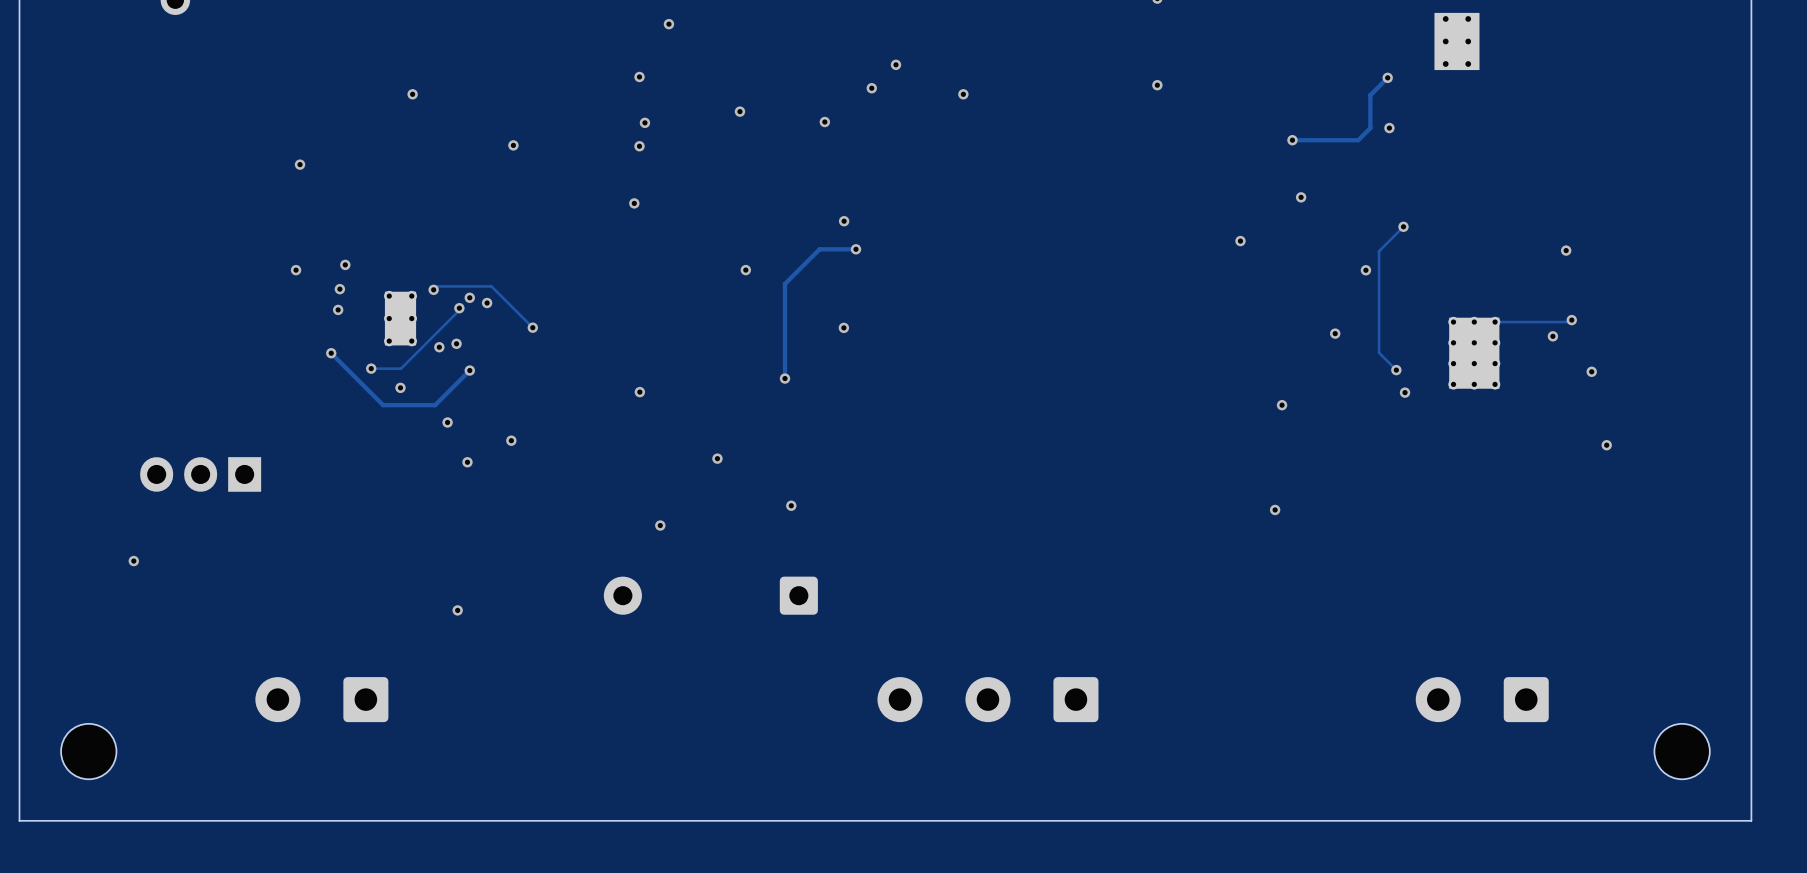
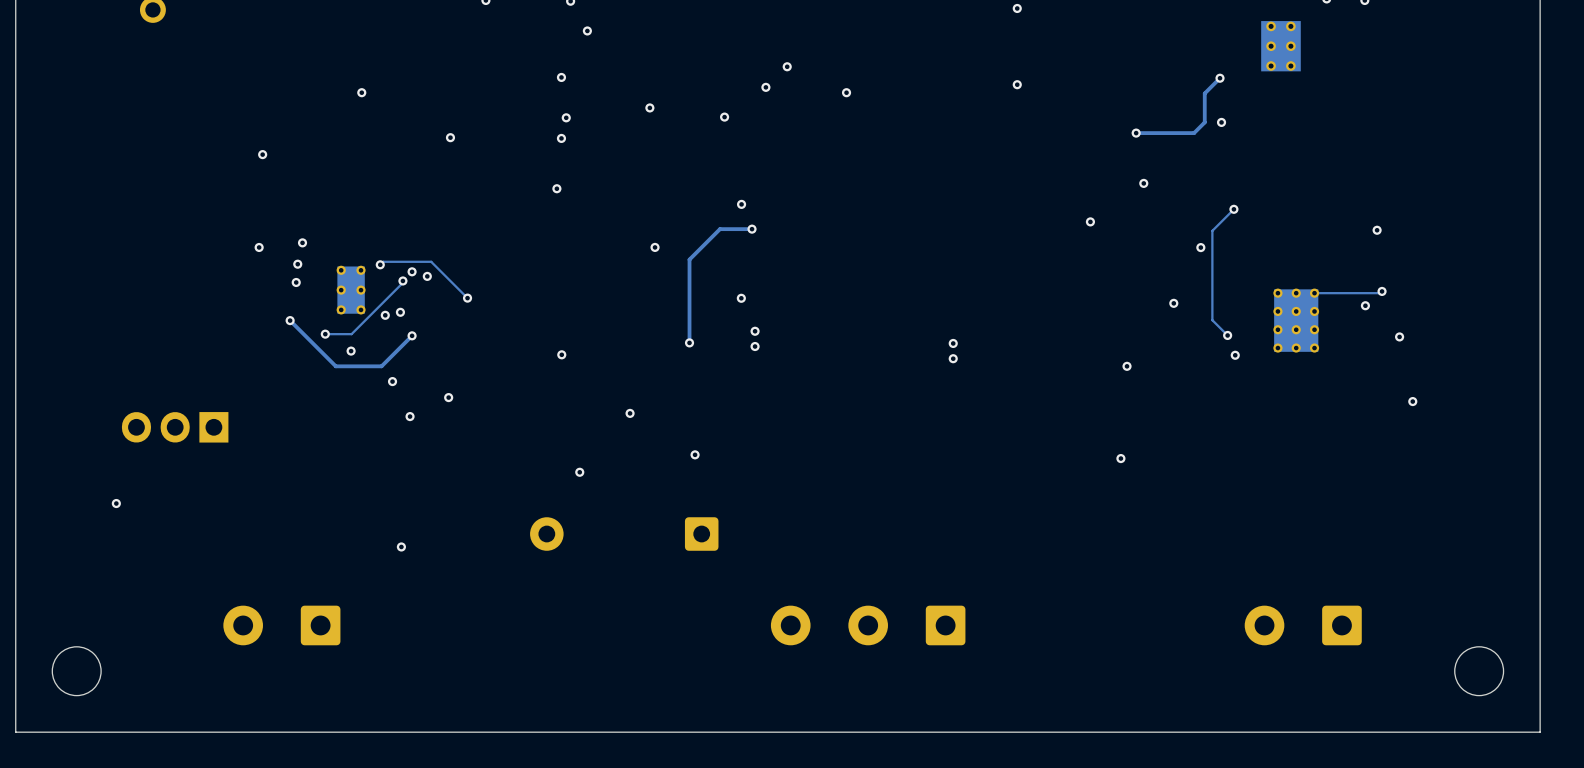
via: none -> (755, 331)
via: none -> (953, 343)
via: none -> (755, 346)
via: none -> (953, 358)

